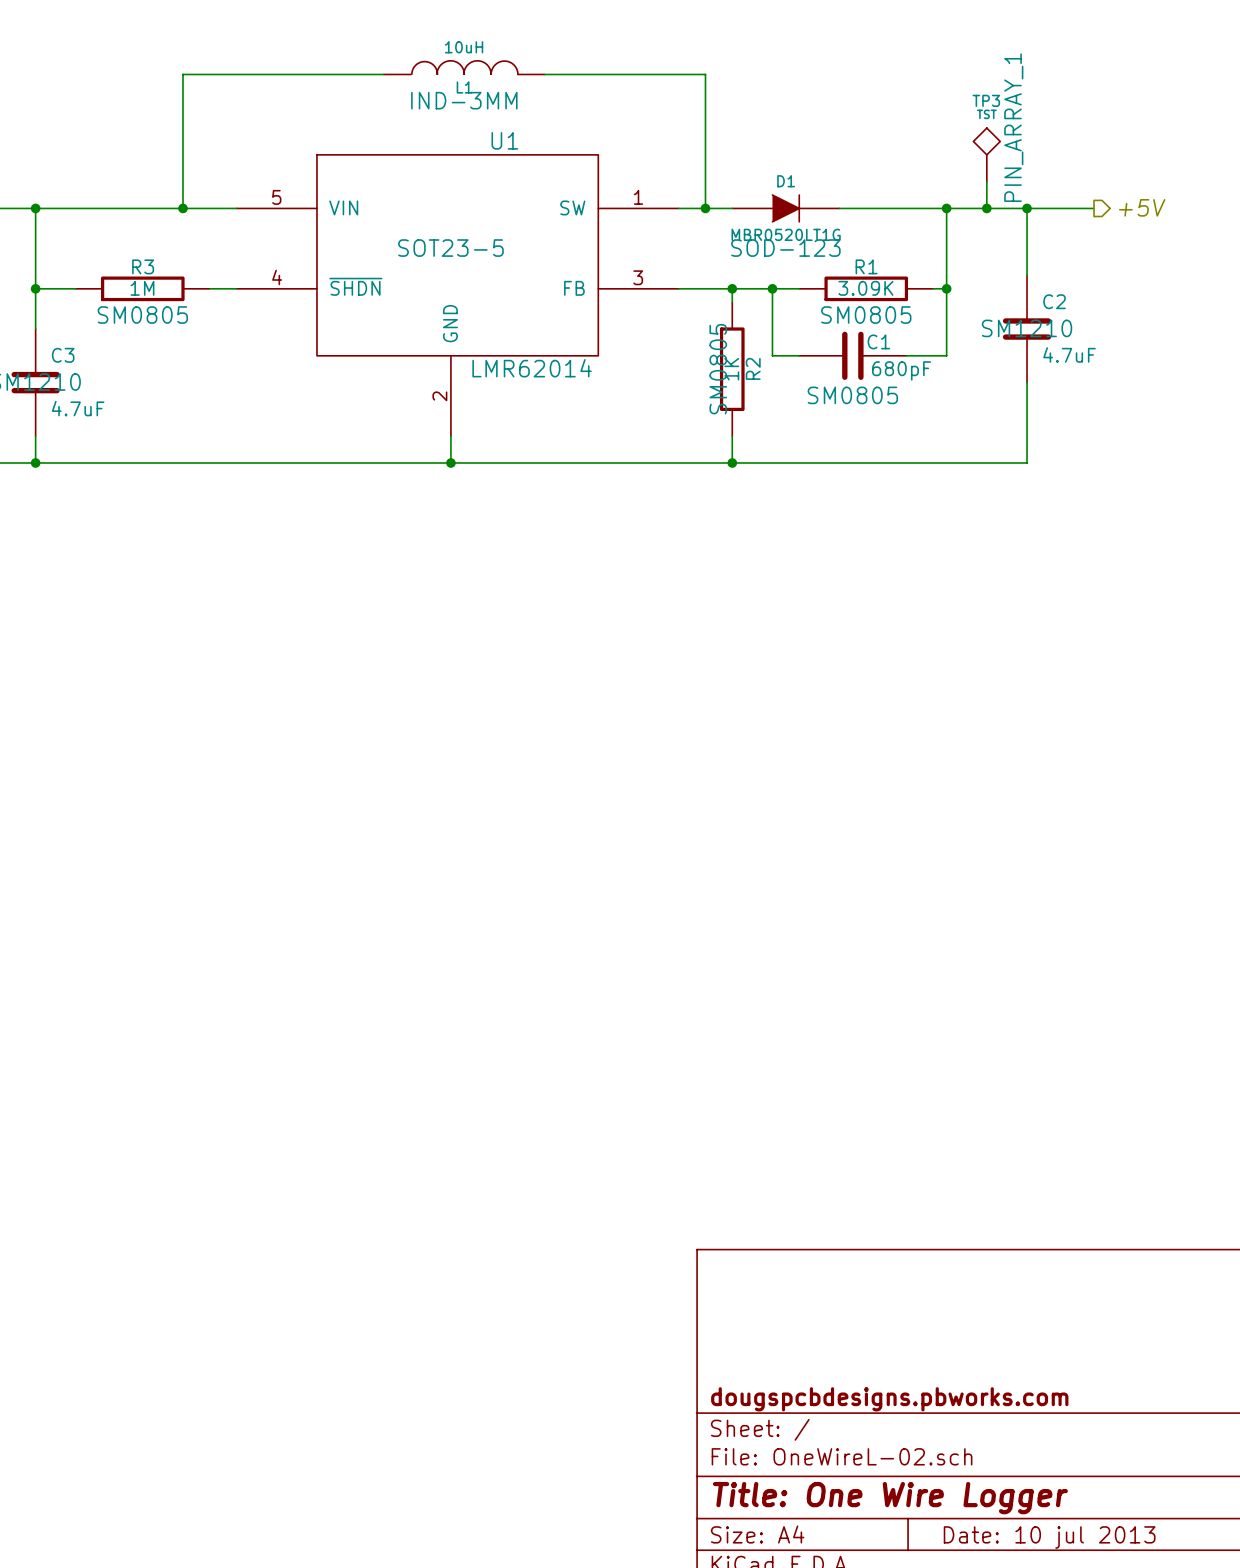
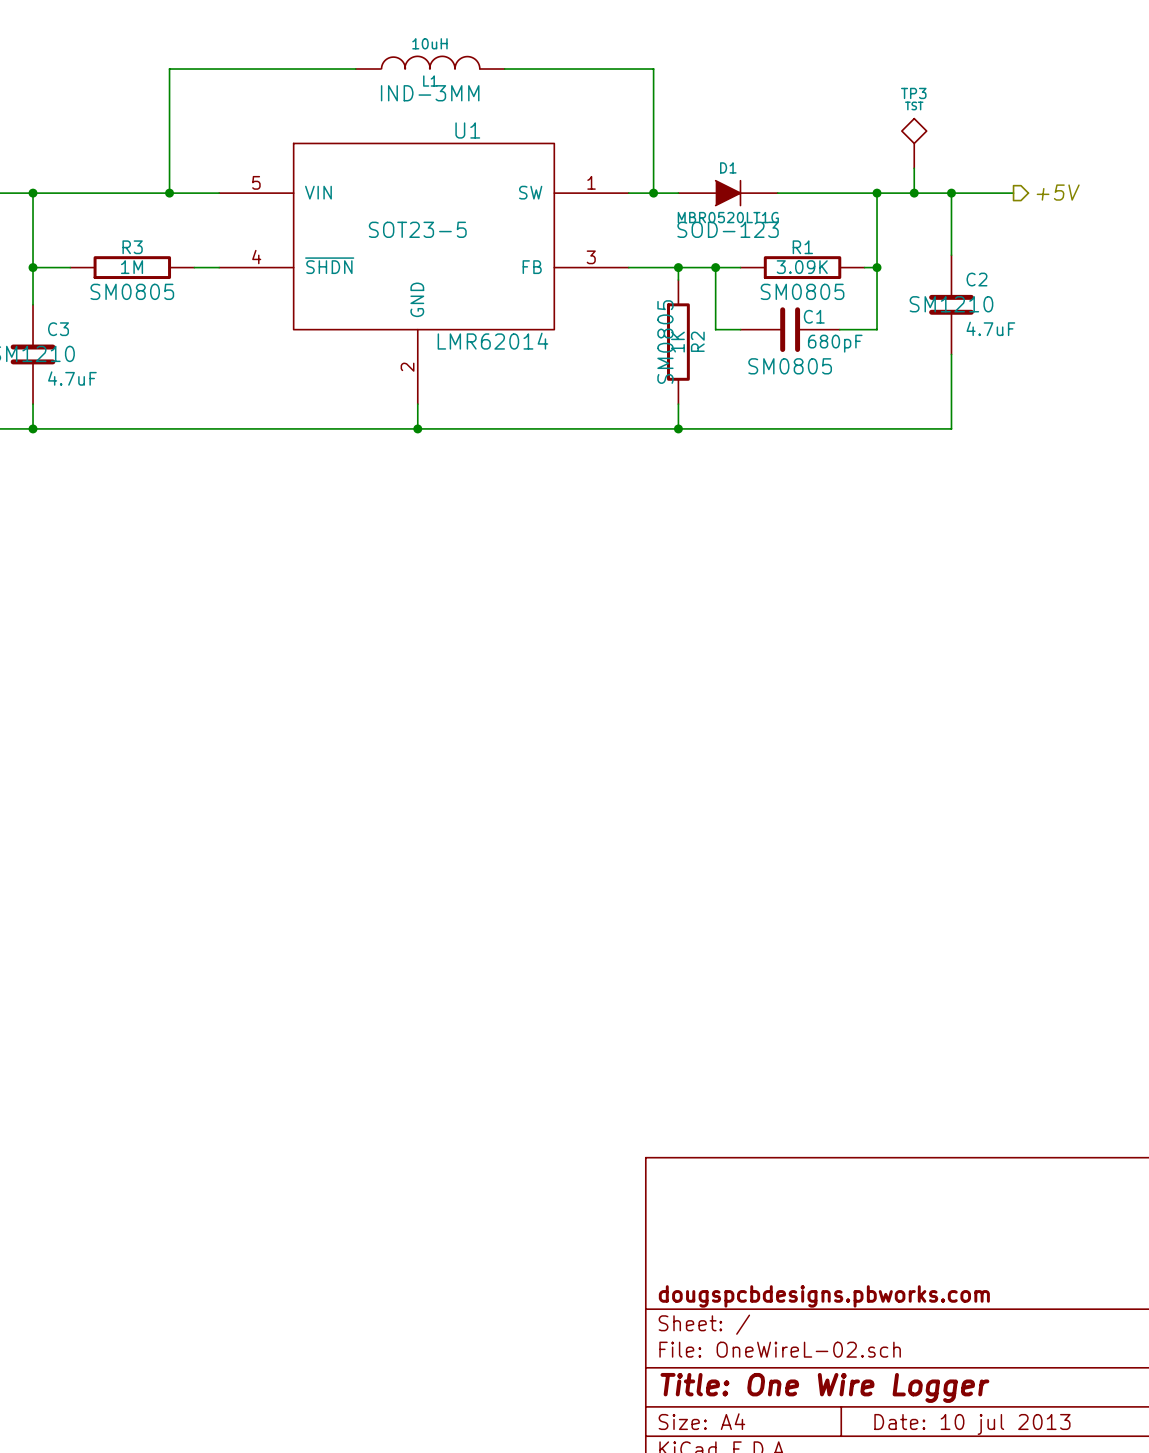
TP3 text: PIN_ARRAY_1 (1013, 127) -> none

